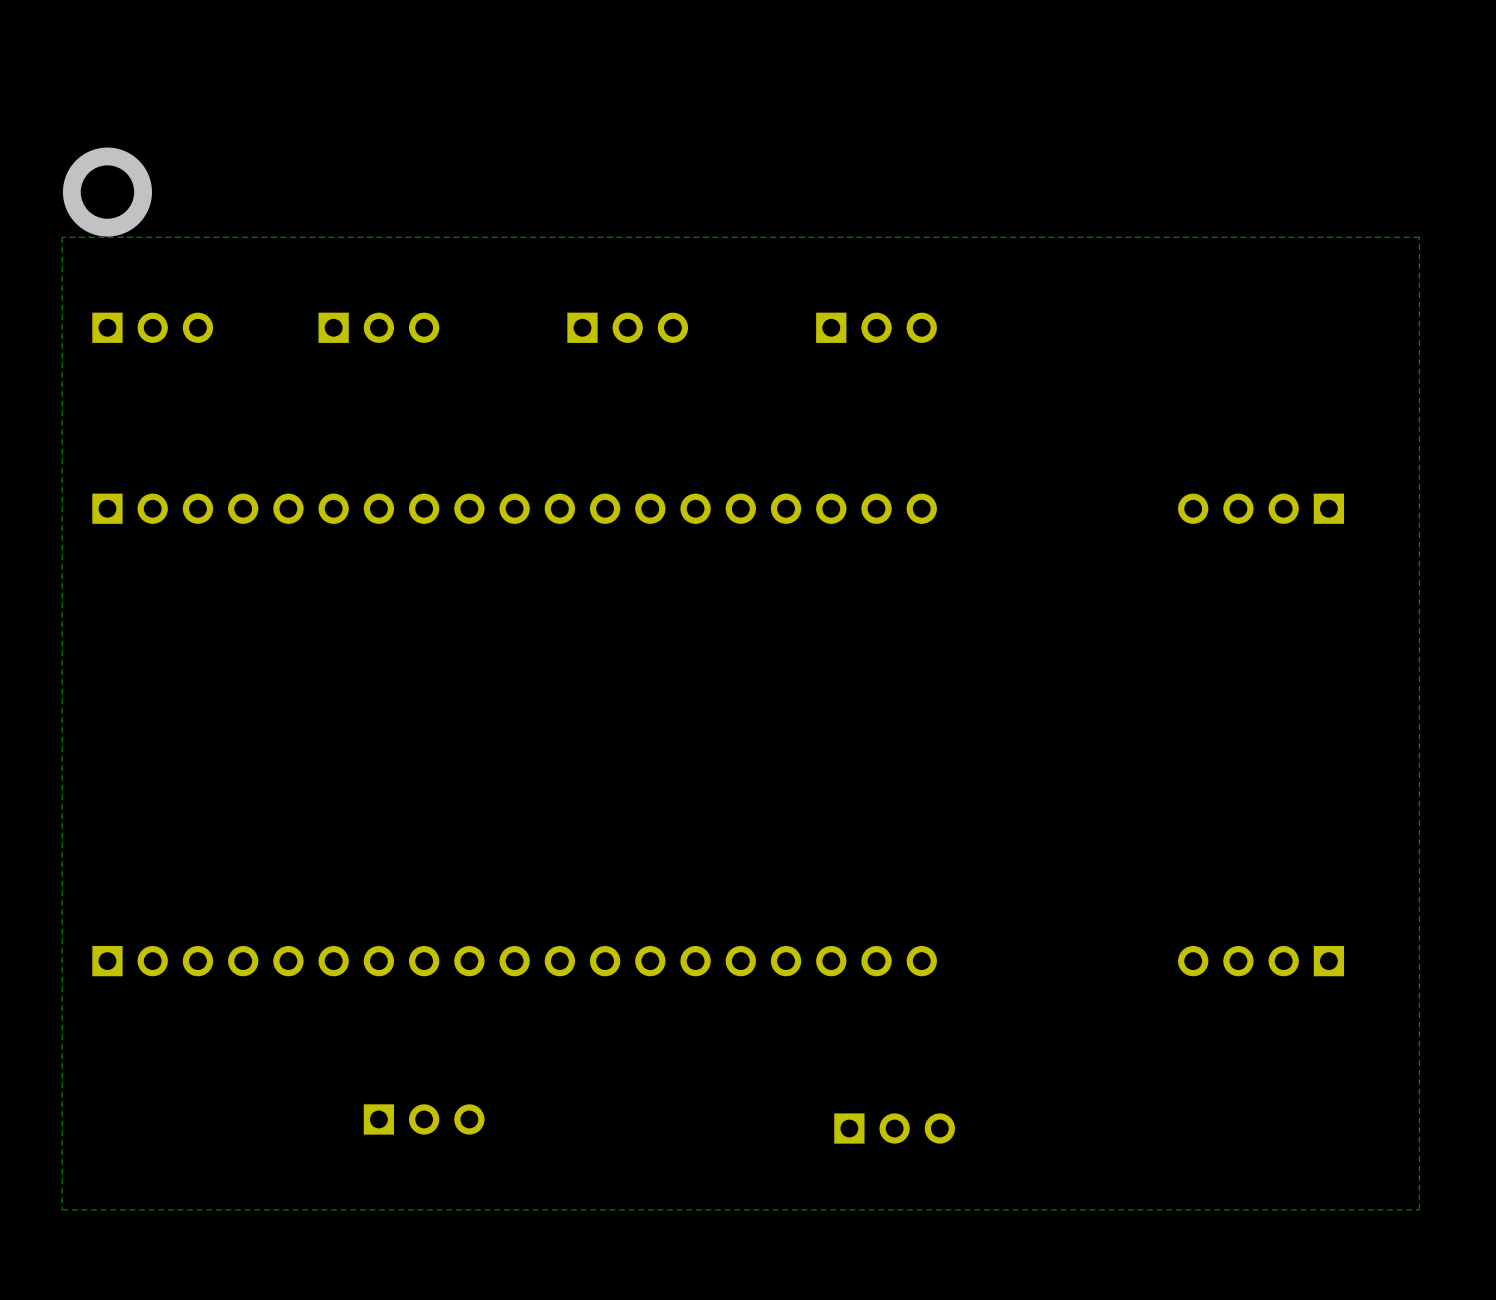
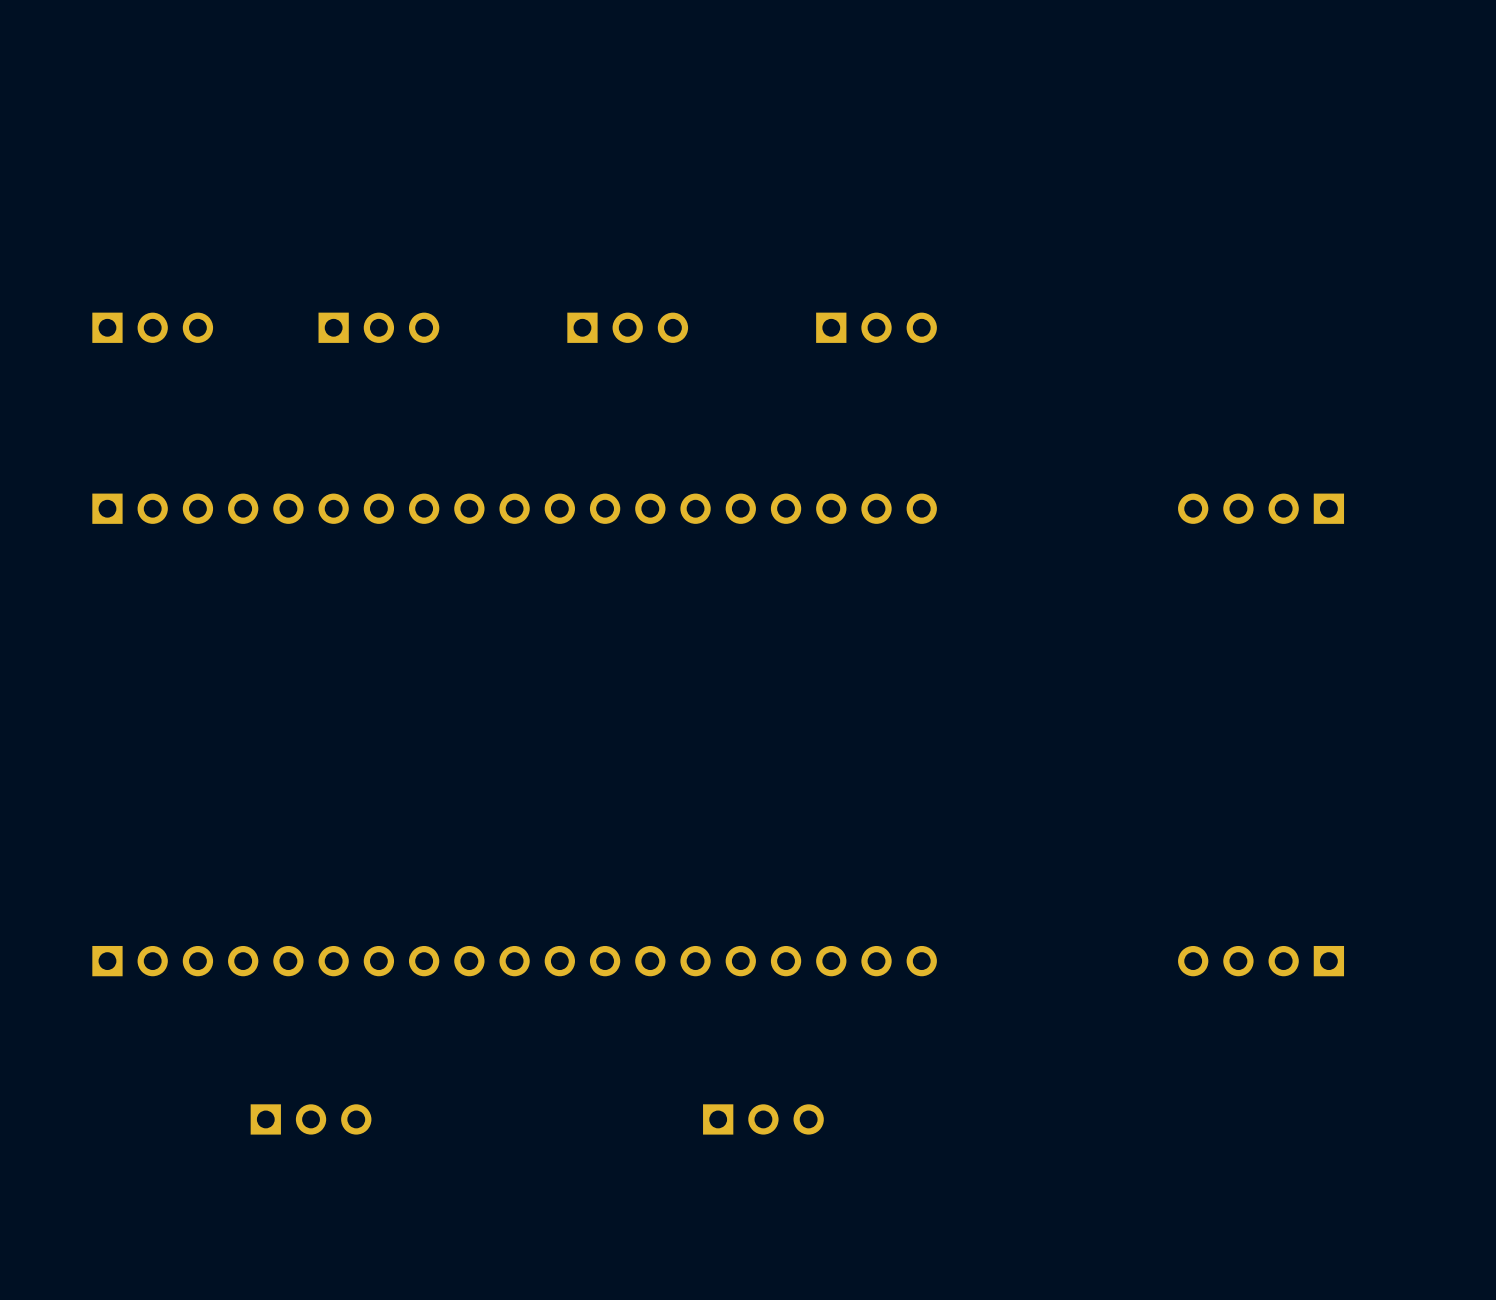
via: (107, 192) -> none
zone outline: (1419, 237) (1419, 1209) (62, 1209) (62, 237) (1419, 237) -> none
part position: (424, 1119) -> (311, 1119)
part position: (894, 1128) -> (763, 1119)

